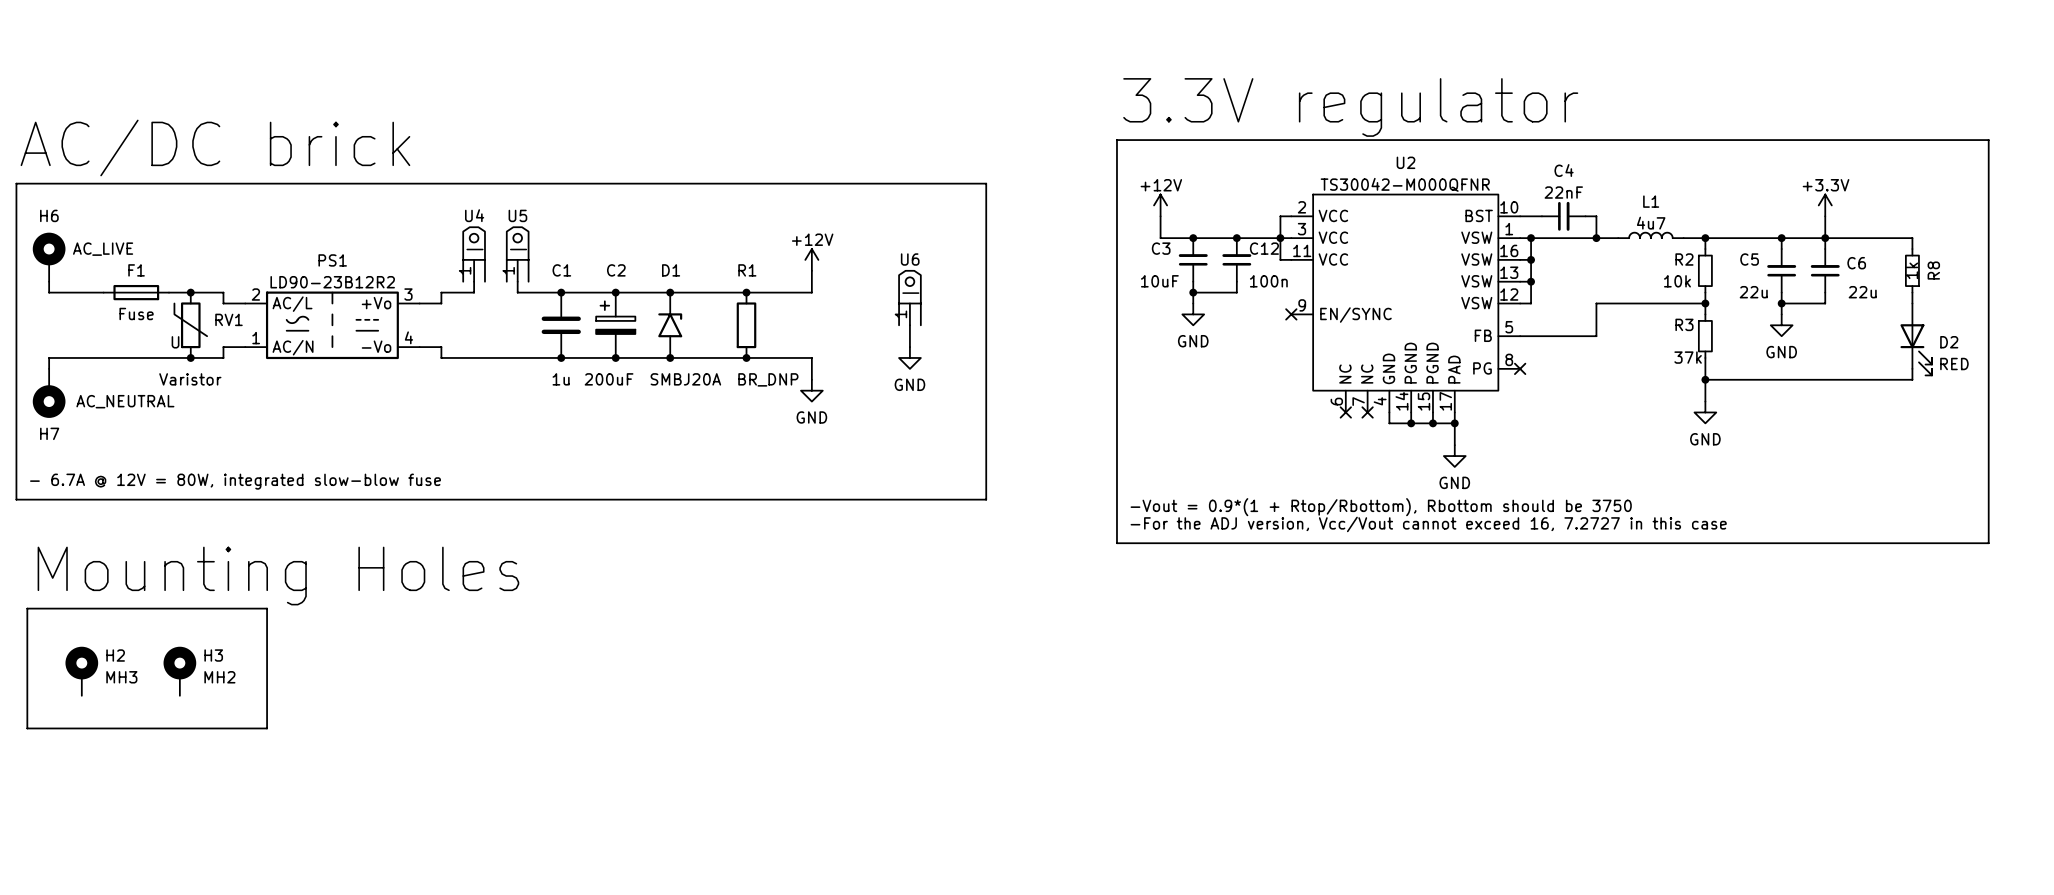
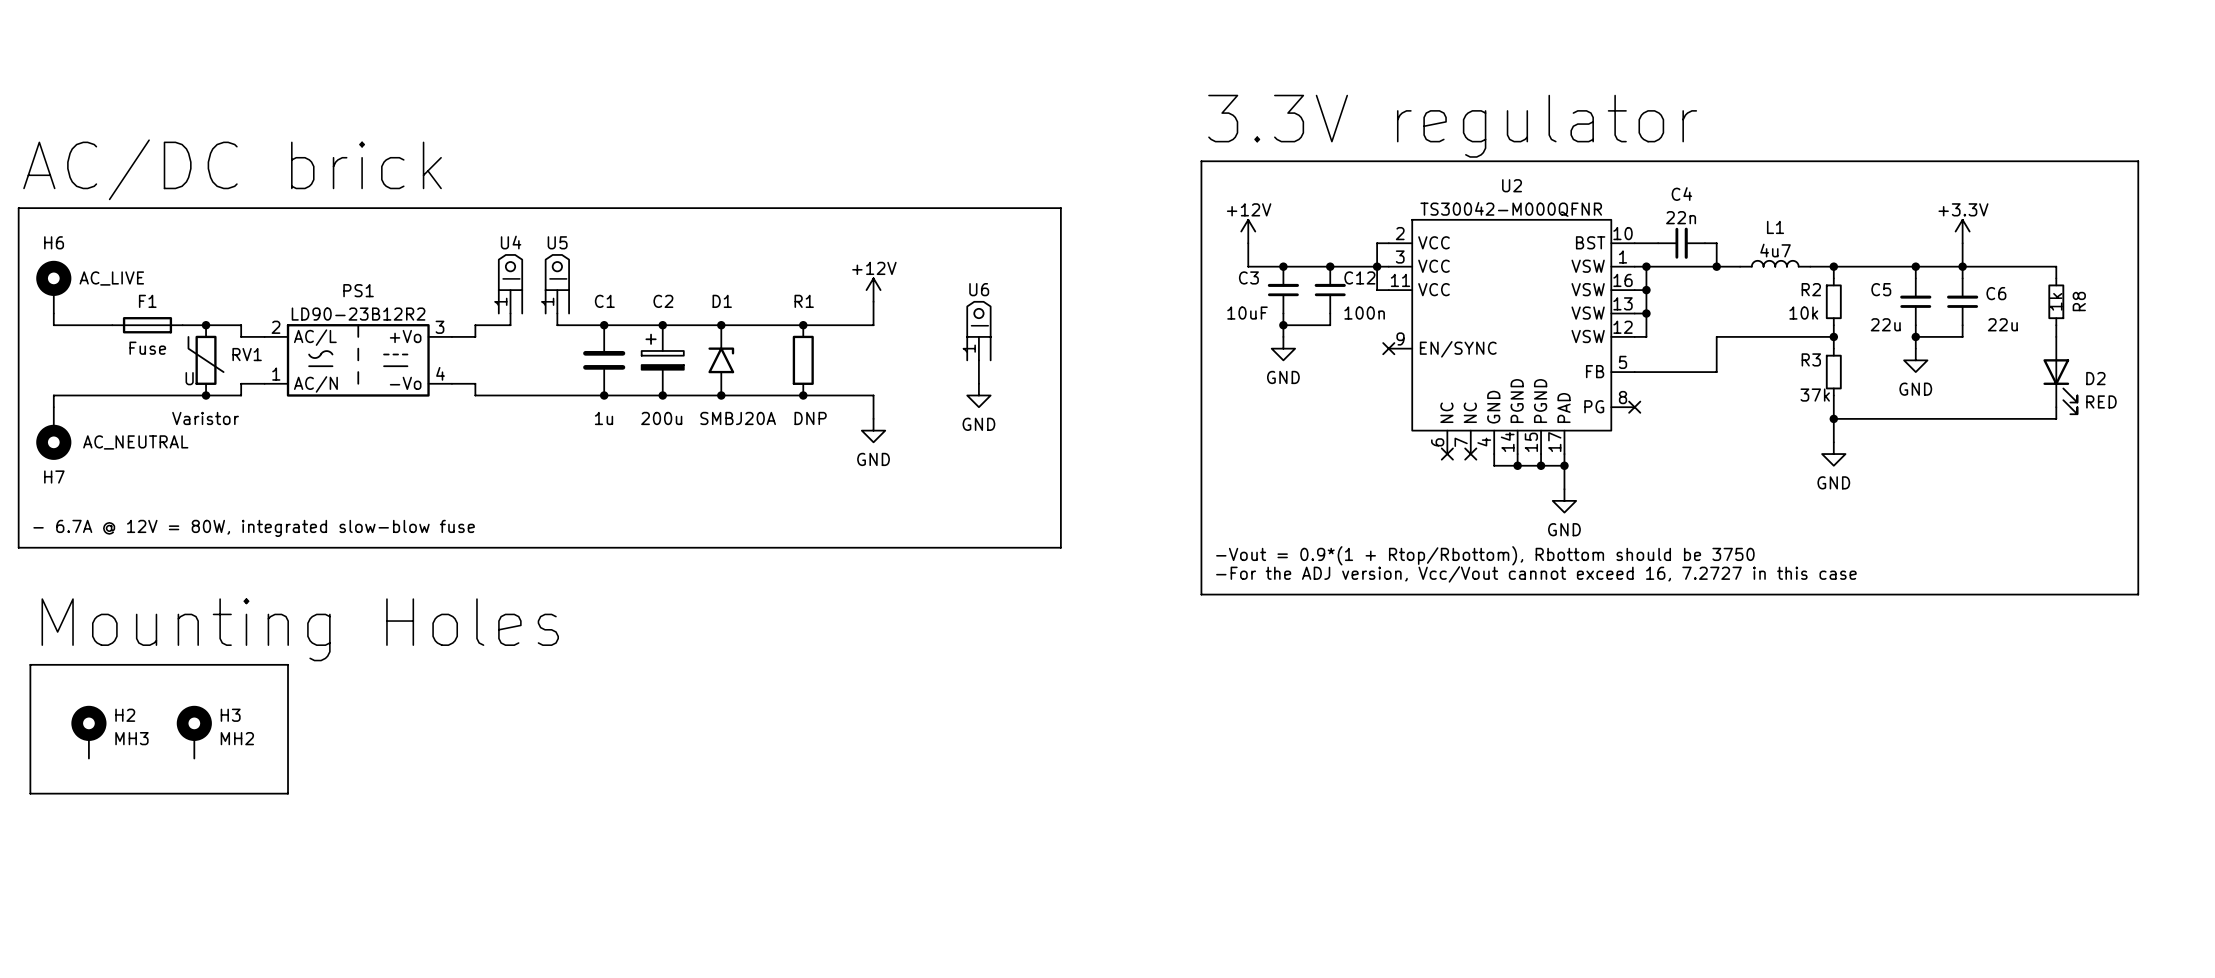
C4 value: 22nF (1563, 192) -> 22n (1681, 217)
C2 value: 200uF (609, 379) -> 200u (661, 418)
R1 value: BR_DNP (768, 379) -> DNP (810, 418)

